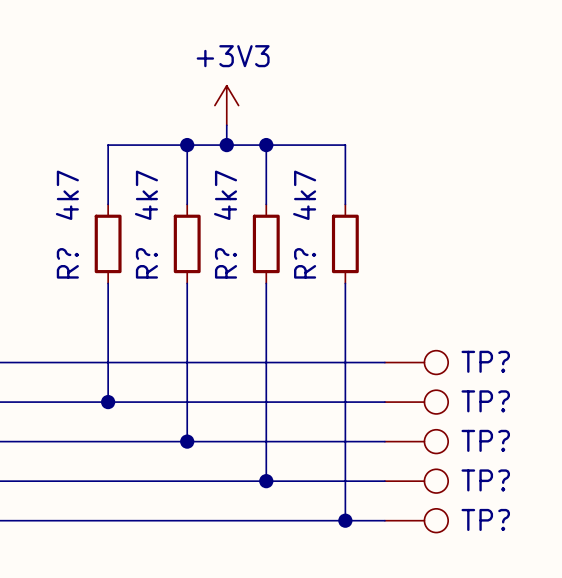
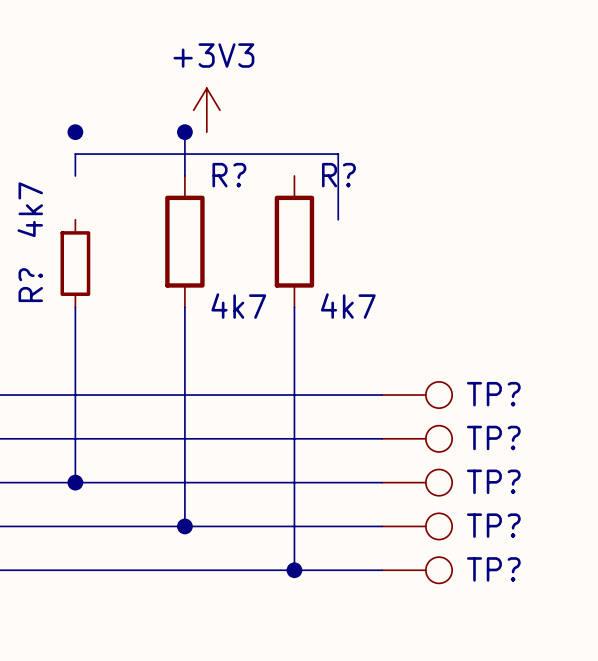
junction: none -> (75, 132)
junction: none -> (184, 132)
wire: (226, 125) (226, 145) -> none
wire: (187, 145) (187, 204) -> none
junction: (187, 145) -> none
junction: (226, 145) -> none
wire: (266, 145) (266, 204) -> none
junction: (266, 145) -> none
wire: (108, 164) (108, 204) -> (184, 132) (184, 175)
R?: none -> 4k7 (184, 241)
R?: none -> 4k7 (294, 241)
R?: 4k7 (187, 243) -> none
R?: 4k7 (266, 243) -> none
R?: 4k7 (345, 243) -> none
wire: (187, 283) (187, 441) -> none
wire: (266, 283) (266, 481) -> (184, 307) (184, 526)
wire: (345, 283) (345, 520) -> (294, 307) (294, 570)
wire: none -> (75, 438) (75, 482)
junction: (108, 402) -> none
junction: none -> (75, 482)
junction: (187, 441) -> none
junction: none -> (184, 526)
junction: (266, 481) -> none
junction: none -> (294, 570)
junction: (345, 520) -> none

